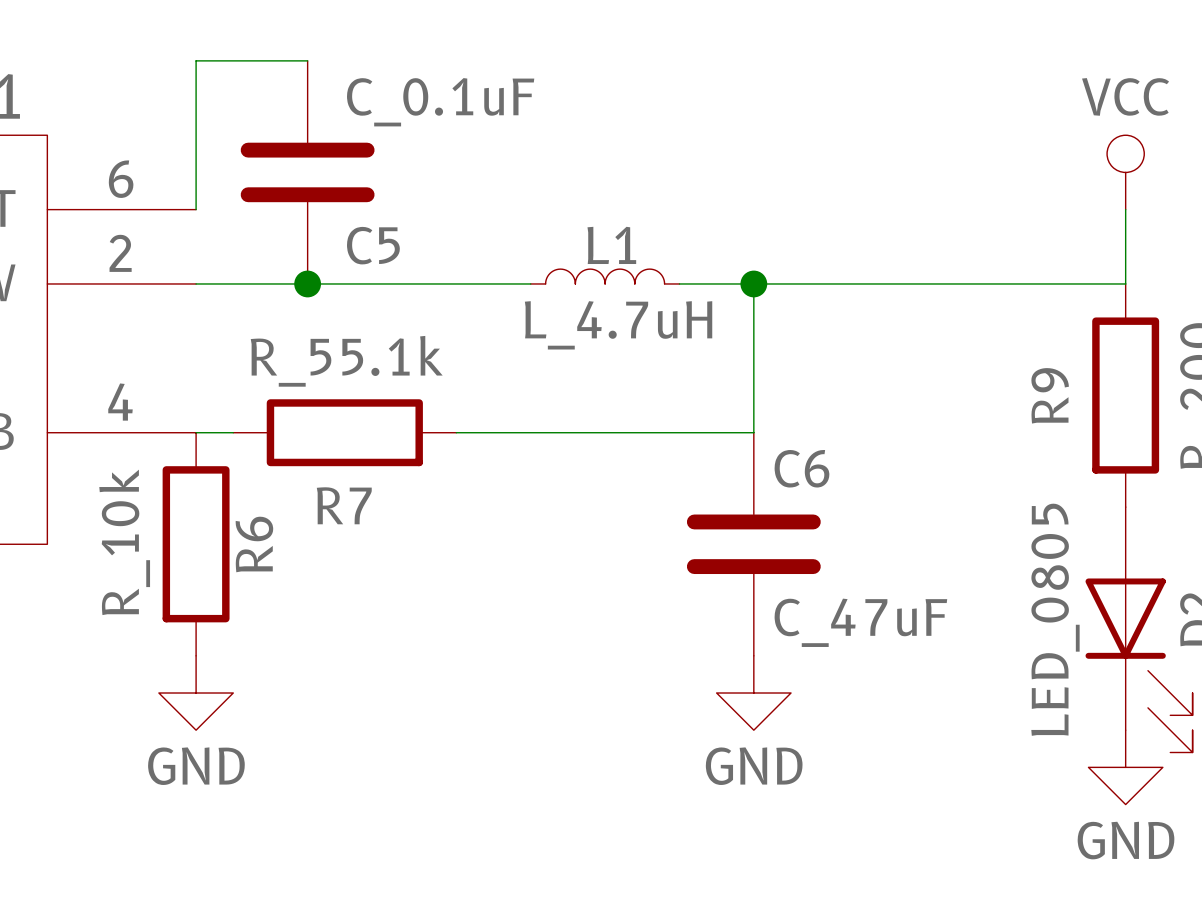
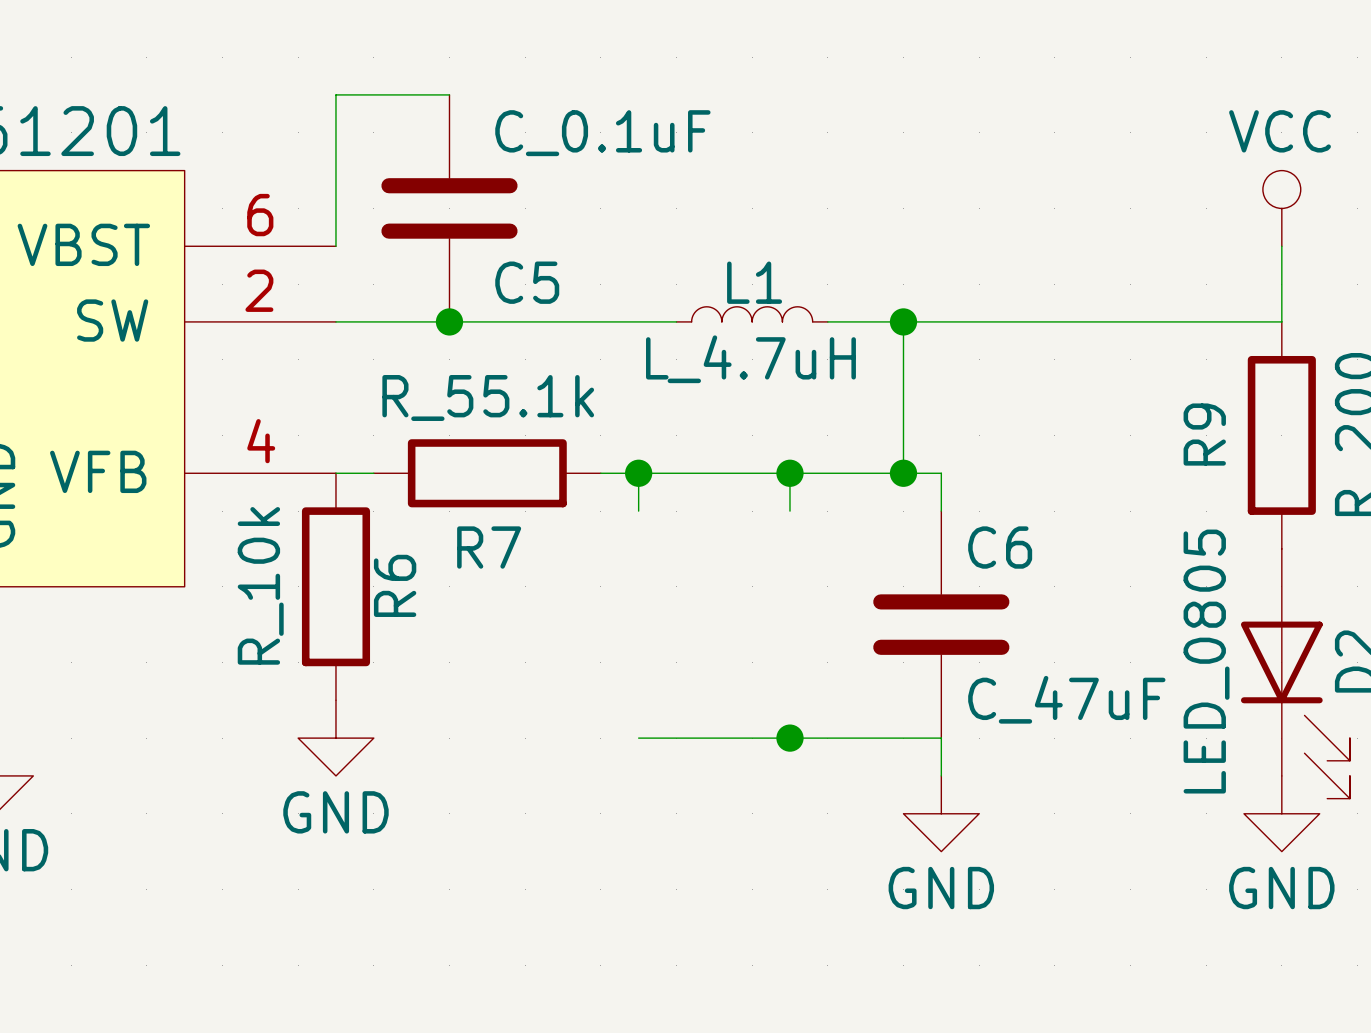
wire: none -> (638, 473) (638, 511)
junction: none -> (638, 473)
wire: none -> (789, 473) (789, 511)
junction: none -> (789, 473)
wire: none -> (903, 473) (941, 473) (941, 511)
junction: none -> (903, 473)
C6 position: (753, 544) -> (941, 624)
wire: none -> (638, 738) (941, 738) (941, 775)
junction: none -> (789, 738)
power symbol position: GND (753, 693) -> GND (941, 813)

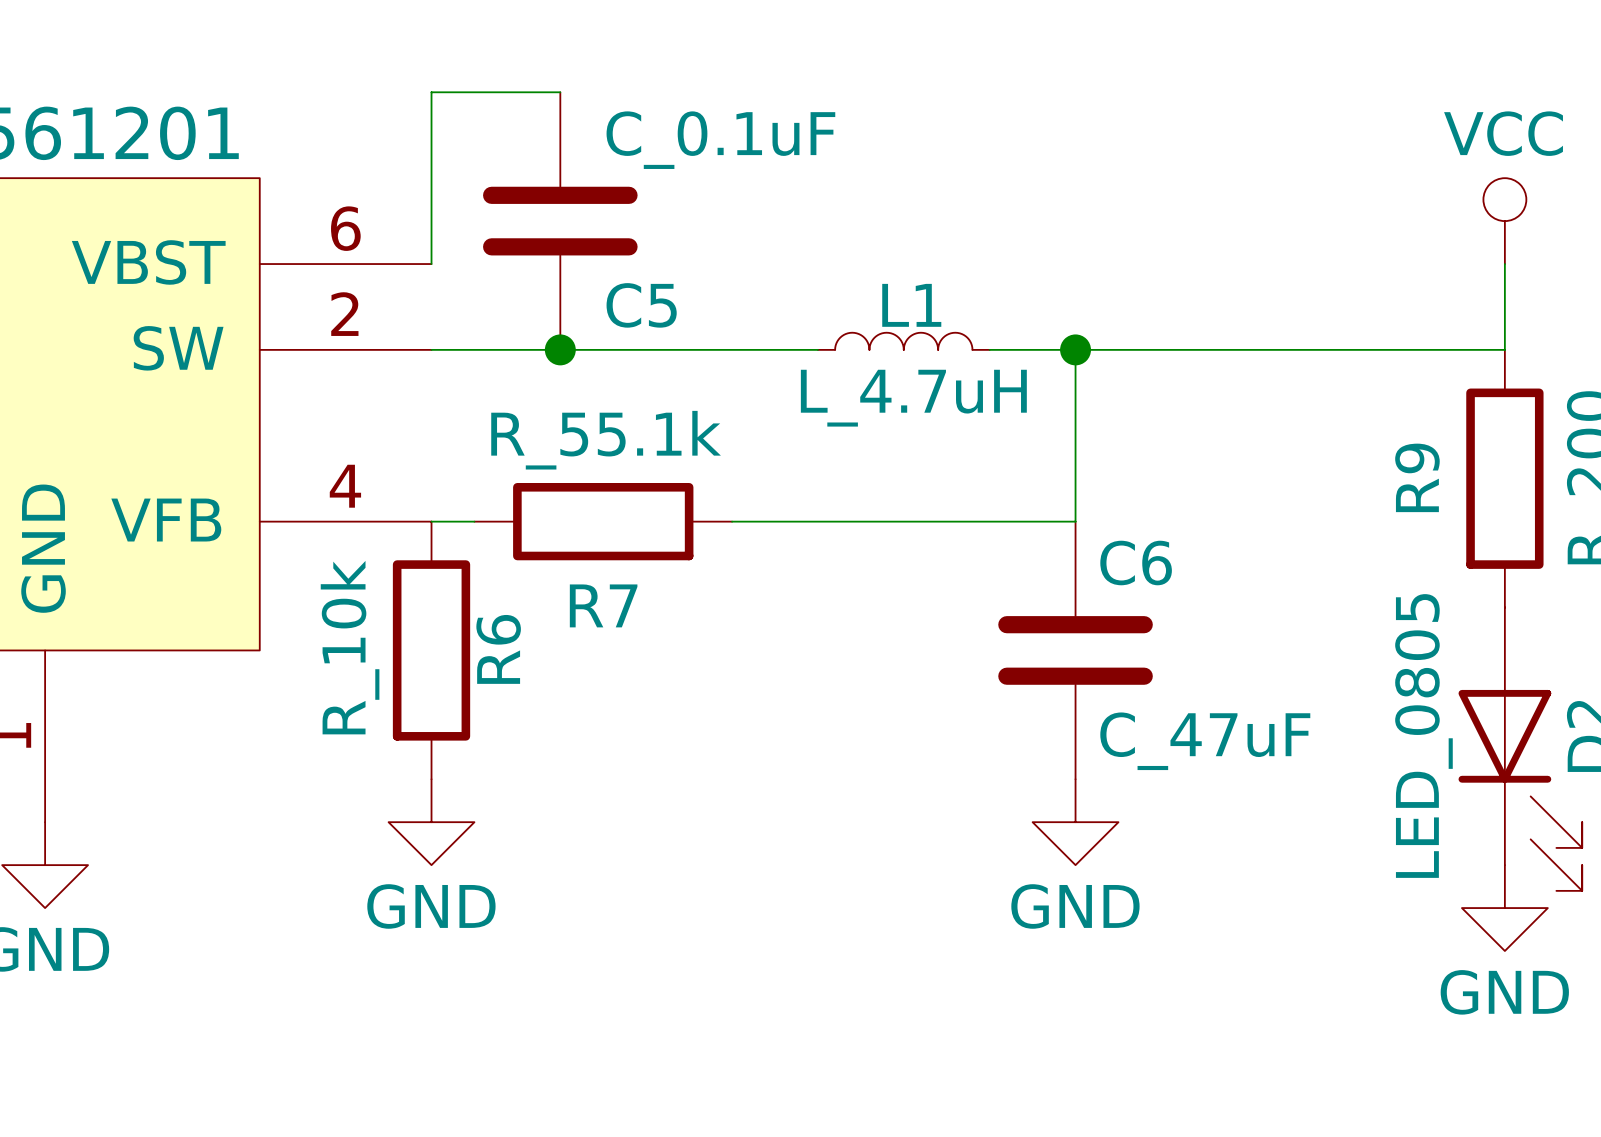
wire: (638, 473) (638, 511) -> none
junction: (638, 473) -> none
wire: (789, 473) (789, 511) -> none
junction: (789, 473) -> none
wire: (903, 473) (941, 473) (941, 511) -> none
junction: (903, 473) -> none
C6 position: (941, 624) -> (1075, 650)
wire: (638, 738) (941, 738) (941, 775) -> none
junction: (789, 738) -> none
power symbol position: GND (941, 813) -> GND (1075, 822)

